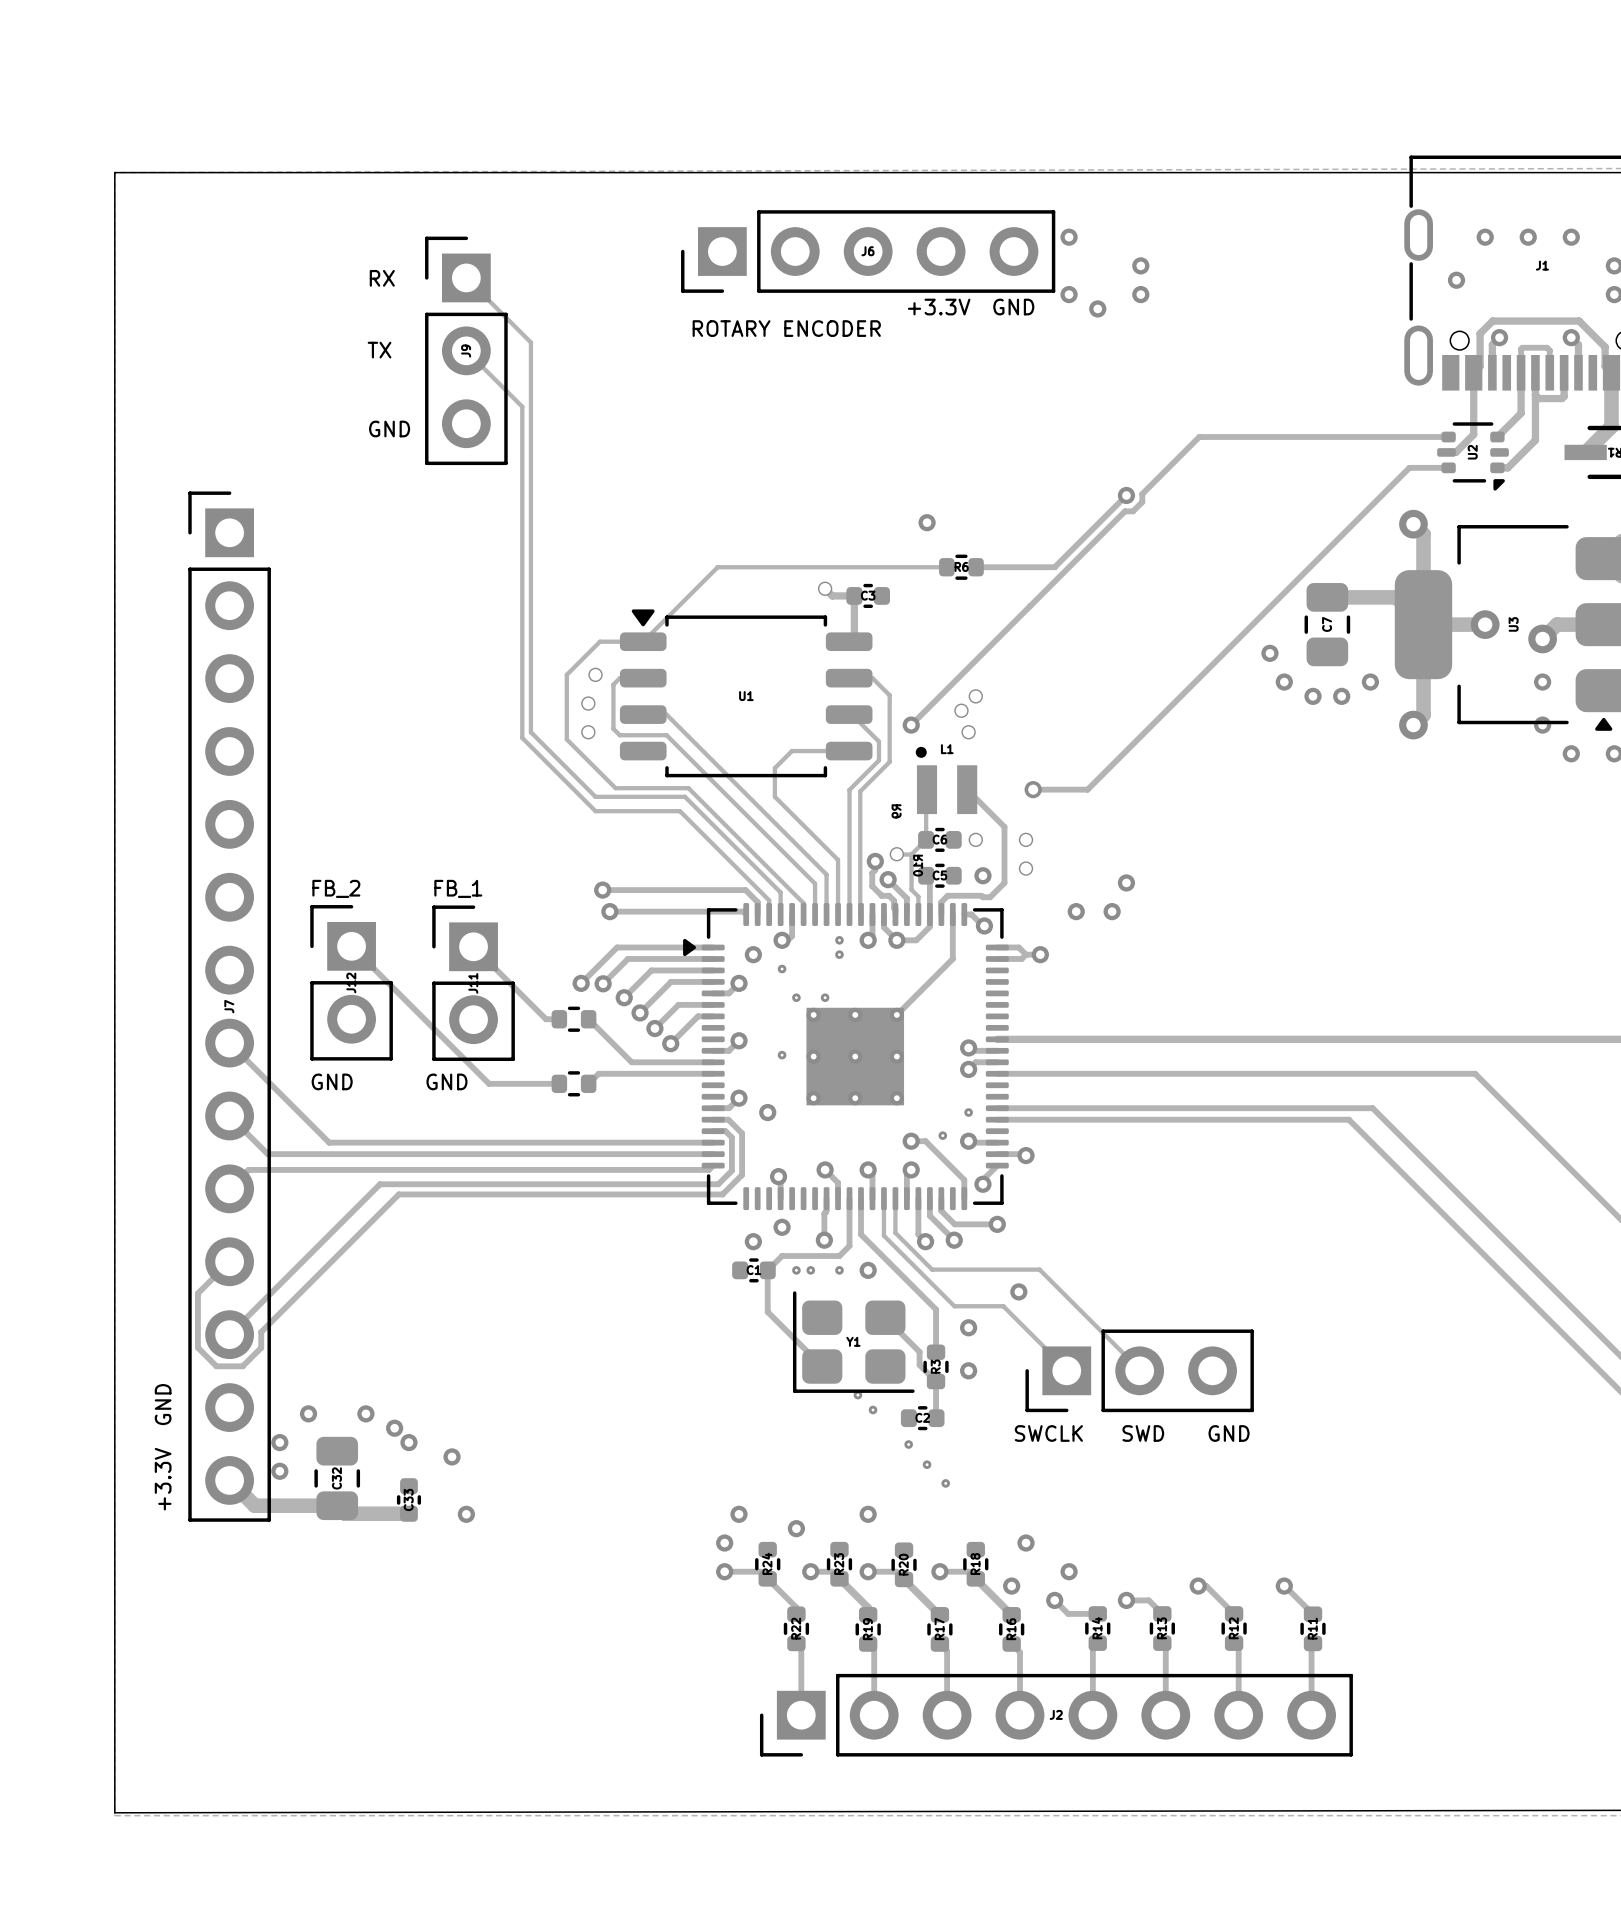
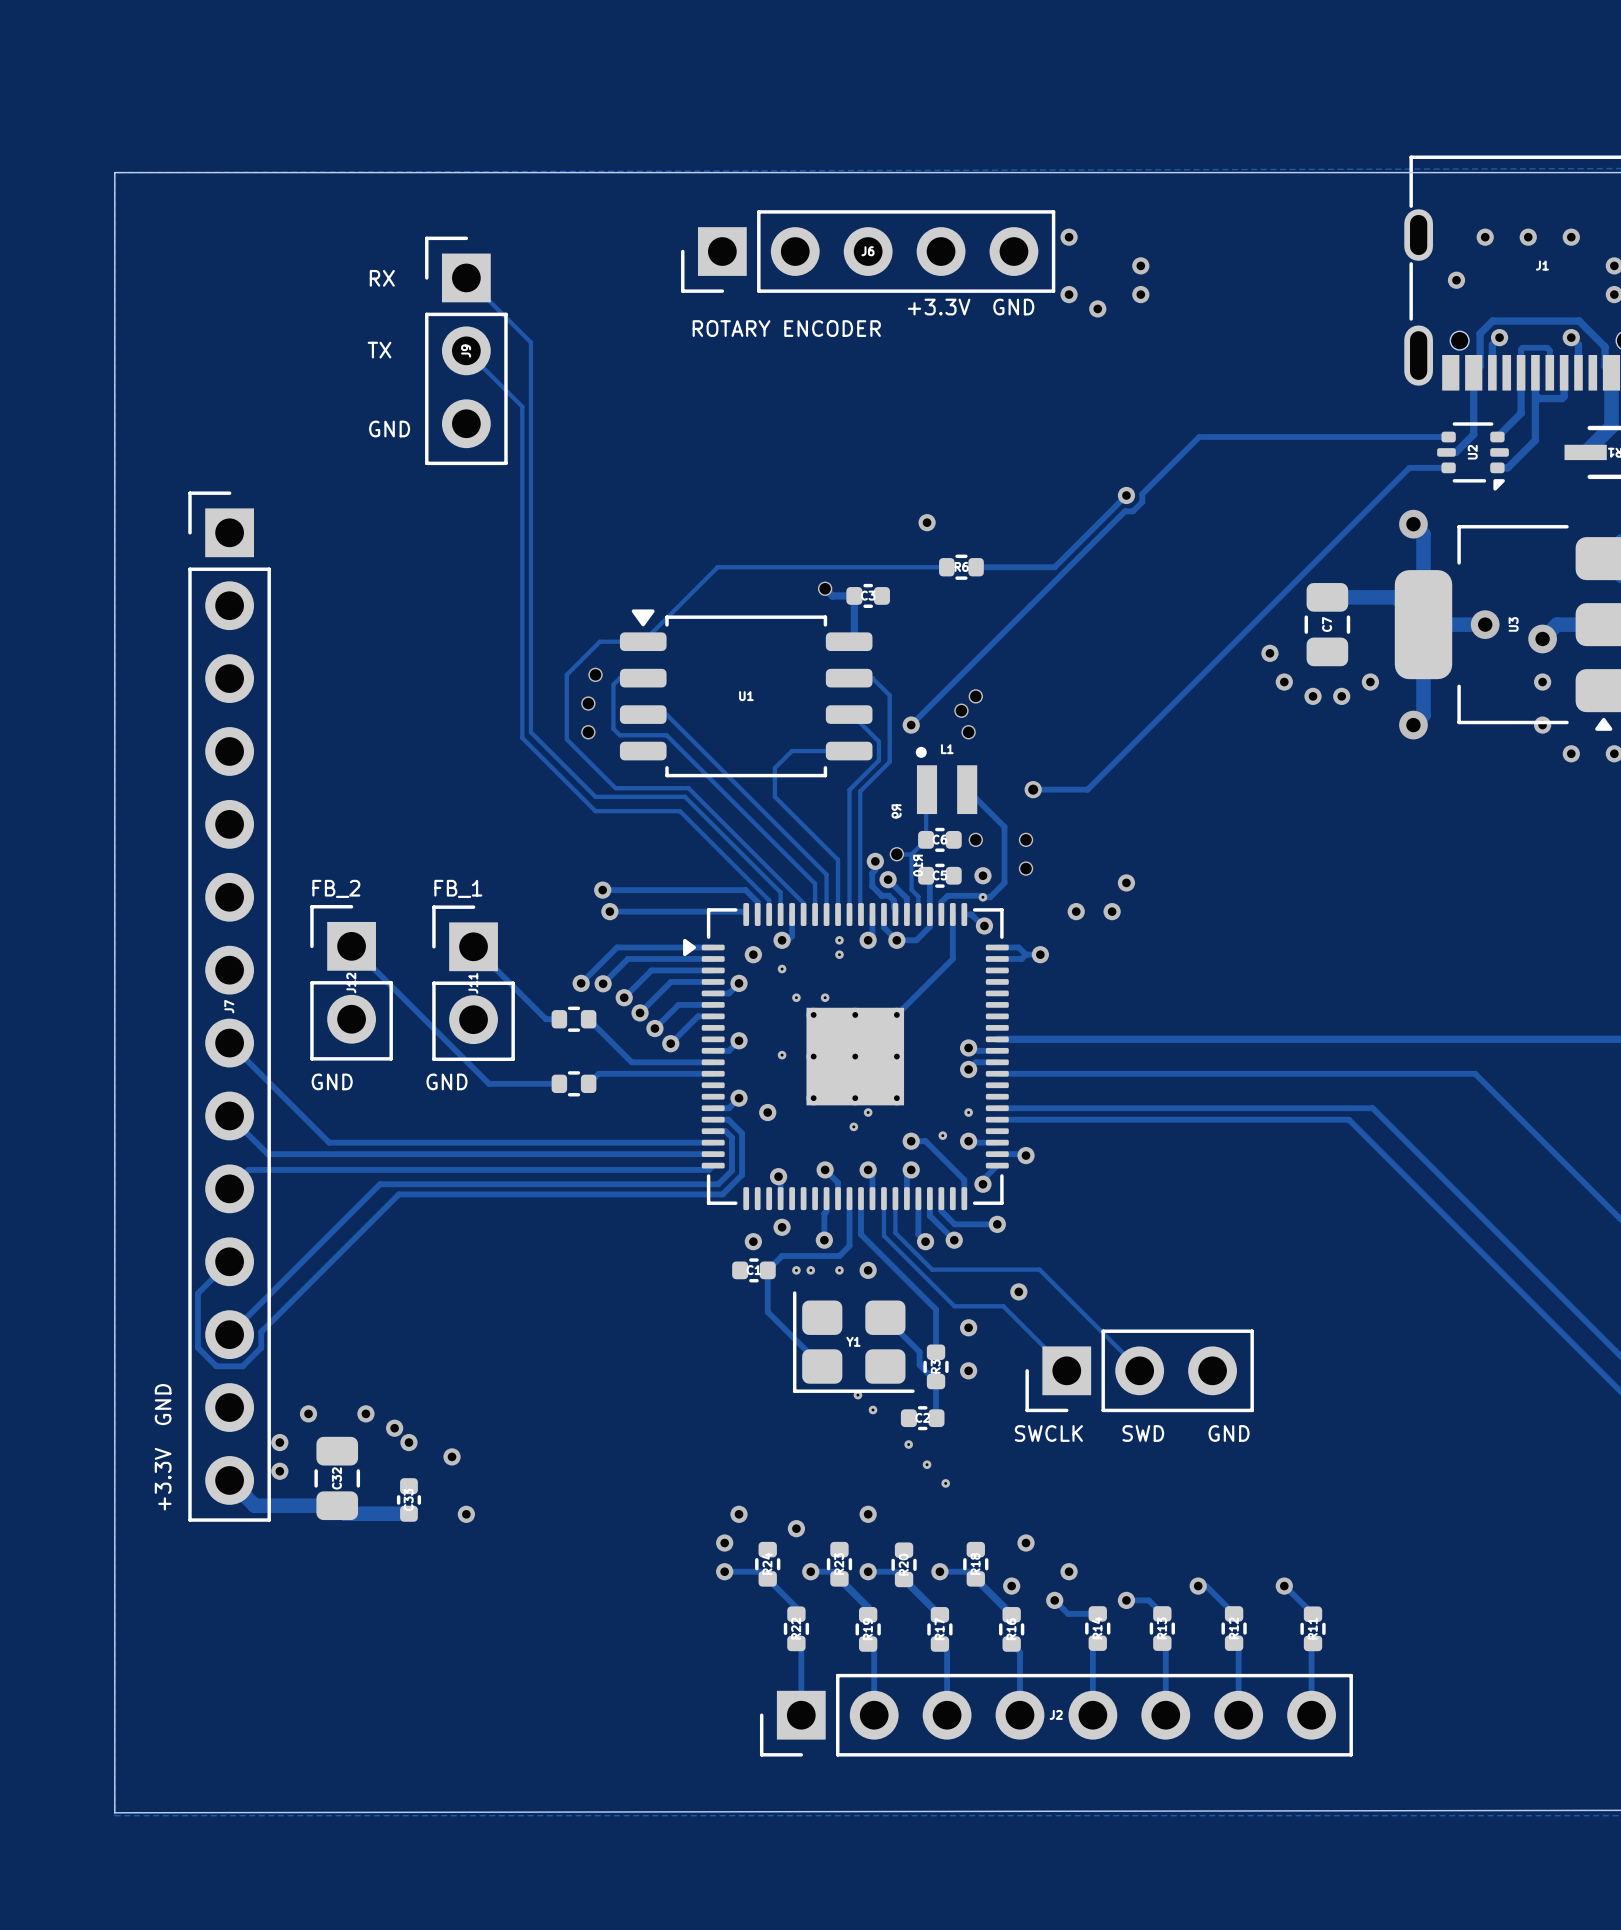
via: none -> (982, 897)
via: none -> (868, 1112)
via: none -> (853, 1126)

